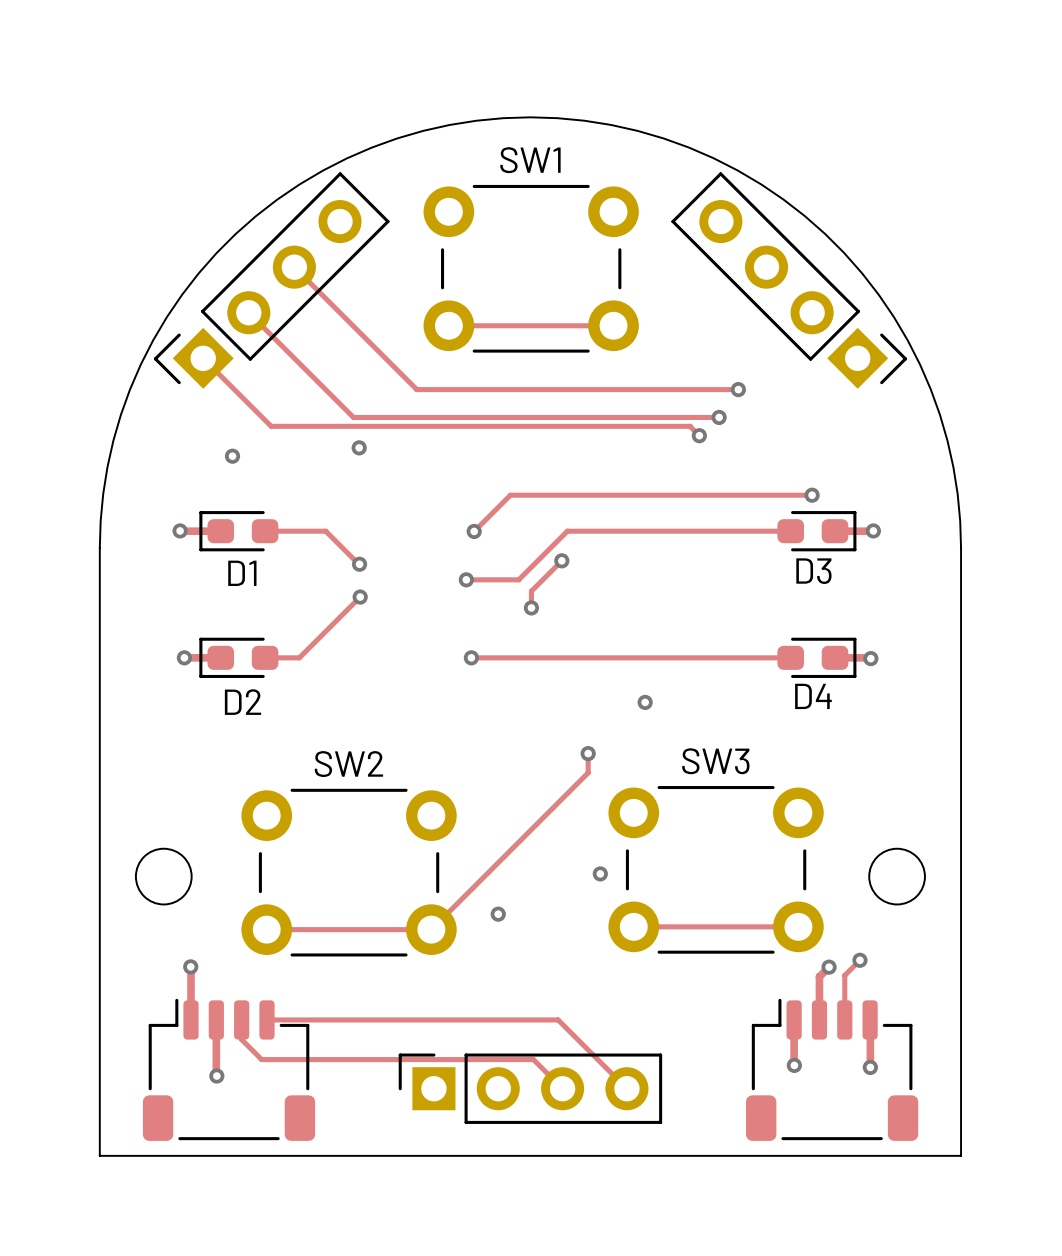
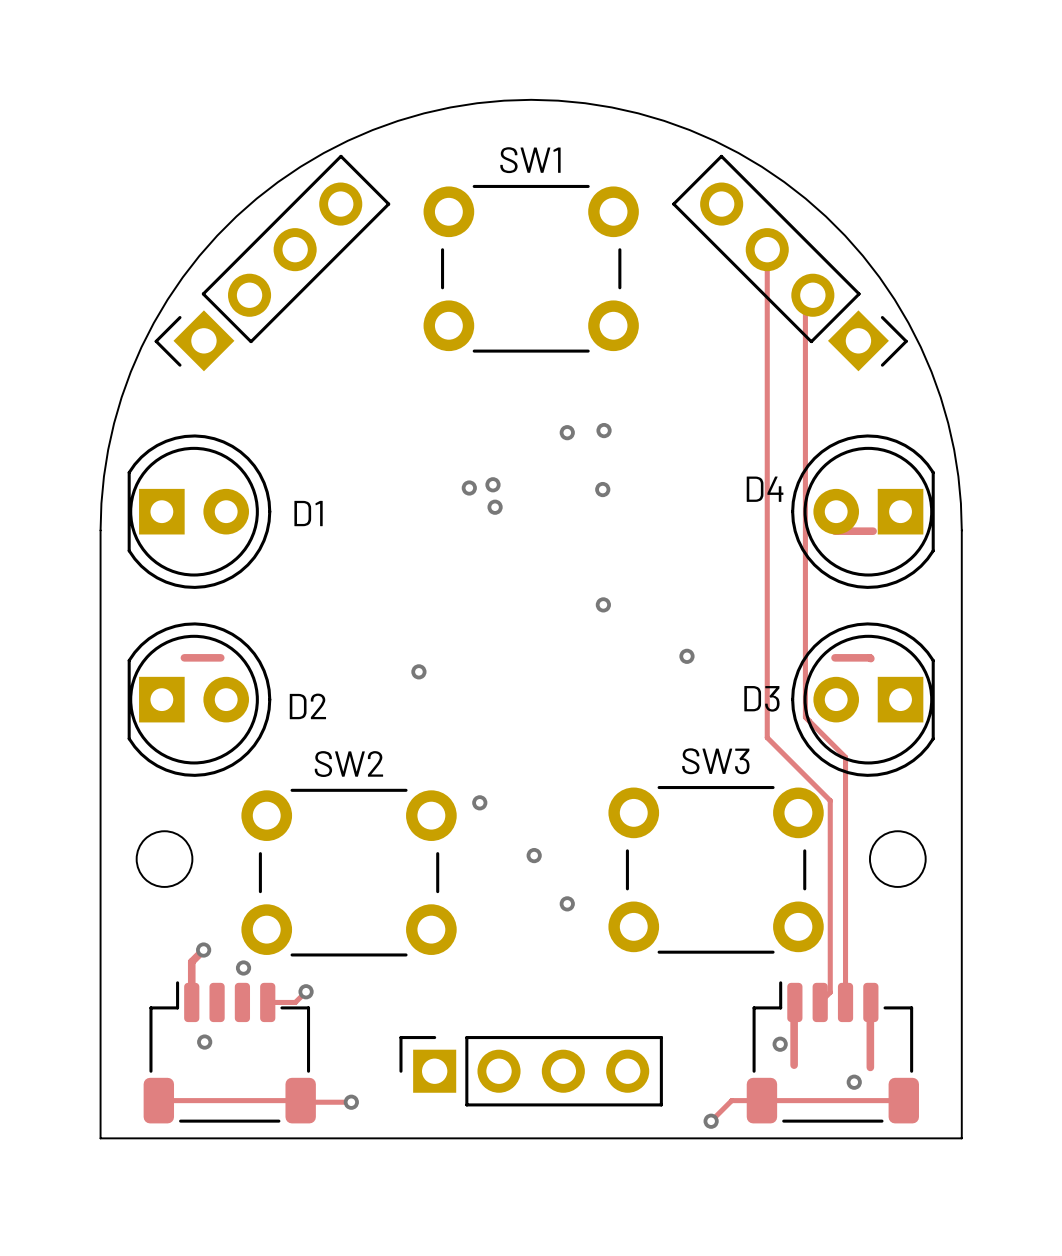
part footprint: [99, 116, 962, 1157] -> [99, 99, 963, 1139]
track: none -> (767, 249) (767, 737) (830, 800) (830, 992) (820, 1002)
track: (294, 267) (416, 389) (738, 389) -> none
track: none -> (812, 295) (805, 302) (805, 717) (845, 757) (845, 1002)
track: (248, 312) (353, 417) (719, 417) -> none
track: (448, 325) (613, 325) -> none
track: (203, 358) (271, 426) (690, 426) (699, 435) -> none
via: (738, 389) -> none
via: (719, 417) -> none
via: none -> (604, 430)
via: none -> (567, 432)
via: (699, 435) -> none
via: (359, 447) -> none
via: (232, 456) -> none
via: none -> (492, 484)
via: none -> (469, 488)
via: none -> (602, 489)
track: (812, 495) (510, 495) (474, 531) -> none
via: (812, 495) -> none
via: none -> (495, 507)
D1 footprint: [199, 511, 279, 552] -> [127, 434, 272, 589]
D3 footprint: [777, 511, 857, 552] -> [791, 622, 935, 777]
via: (180, 530) -> none
via: (873, 530) -> none
track: (180, 531) (220, 531) -> none
track: (265, 531) (325, 531) (359, 564) -> none
via: (474, 531) -> none
track: (790, 531) (567, 531) (518, 579) (466, 579) -> none
track: (561, 560) (531, 591) (531, 607) -> none
via: (561, 560) -> none
via: (359, 564) -> none
D3 name position: D3 (813, 571) -> D3 (761, 698)
D1 name position: D1 (242, 573) -> D1 (308, 513)
via: (466, 579) -> none
track: (360, 597) (299, 657) (265, 657) -> none
via: (360, 597) -> none
via: none -> (603, 604)
via: (531, 607) -> none
D2 footprint: [199, 637, 279, 678] -> [127, 622, 272, 777]
D4 footprint: [777, 637, 857, 678] -> [791, 434, 935, 589]
via: none -> (686, 656)
via: (184, 657) -> none
track: (471, 657) (790, 657) -> none
via: (471, 657) -> none
via: (870, 658) -> none
via: none -> (418, 671)
D4 name position: D4 (813, 696) -> D4 (765, 489)
D2 name position: D2 (243, 702) -> D2 (307, 706)
via: (645, 702) -> none
track: (588, 753) (588, 772) (431, 929) (266, 929) -> none
via: (588, 753) -> none
via: none -> (479, 802)
via: none -> (534, 855)
via: (600, 873) -> none
via: none -> (567, 903)
via: (498, 914) -> none
track: (633, 926) (798, 926) -> none
track: none -> (203, 950) (191, 961) (191, 1002)
track: (859, 960) (844, 975) (844, 1019) -> none
via: (859, 960) -> none
via position: (190, 966) -> (203, 950)
track: (191, 967) (191, 1019) -> none
via: none -> (243, 967)
track: (829, 967) (819, 976) (819, 1019) -> none
via: (829, 967) -> none
track: none -> (306, 991) (295, 1002) (267, 1002)
via: none -> (306, 991)
track: (216, 1019) (216, 1076) -> none
track: (241, 1019) (241, 1039) (261, 1059) (533, 1059) (562, 1088) -> none
track: (267, 1019) (558, 1019) (626, 1088) -> none
via position: (794, 1065) -> (780, 1044)
via position: (870, 1067) -> (854, 1082)
via position: (216, 1076) -> (204, 1042)
track: none -> (158, 1100) (351, 1102)
track: none -> (903, 1100) (731, 1100) (711, 1121)
via: none -> (351, 1102)
via: none -> (711, 1121)

